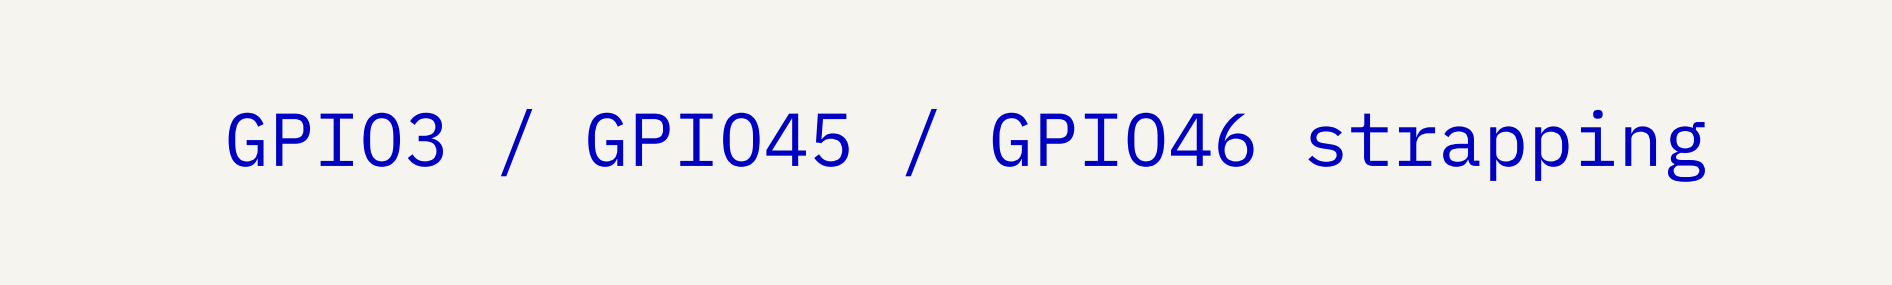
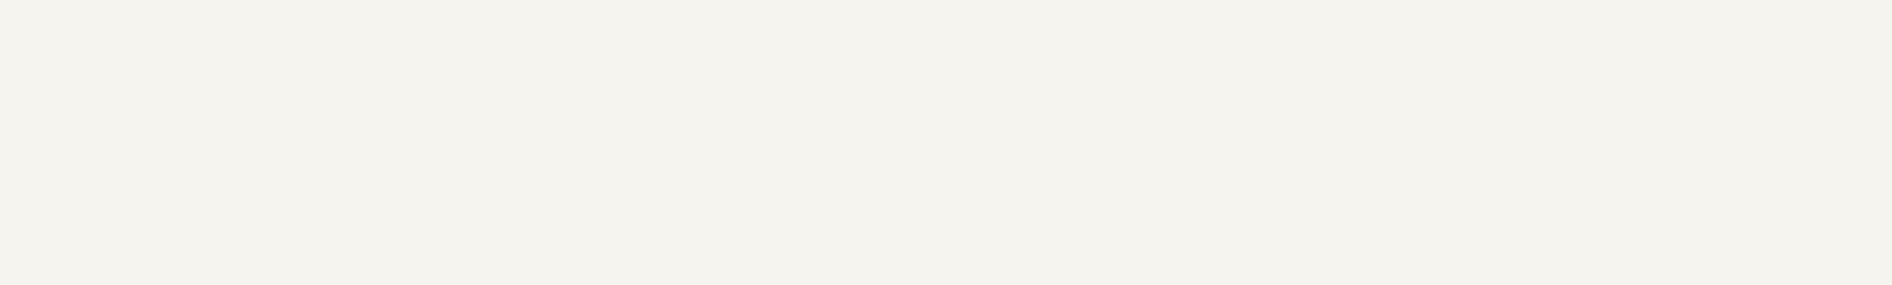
text: GPIO3 / GPIO45 / GPIO46 strapping (966, 145) -> none

